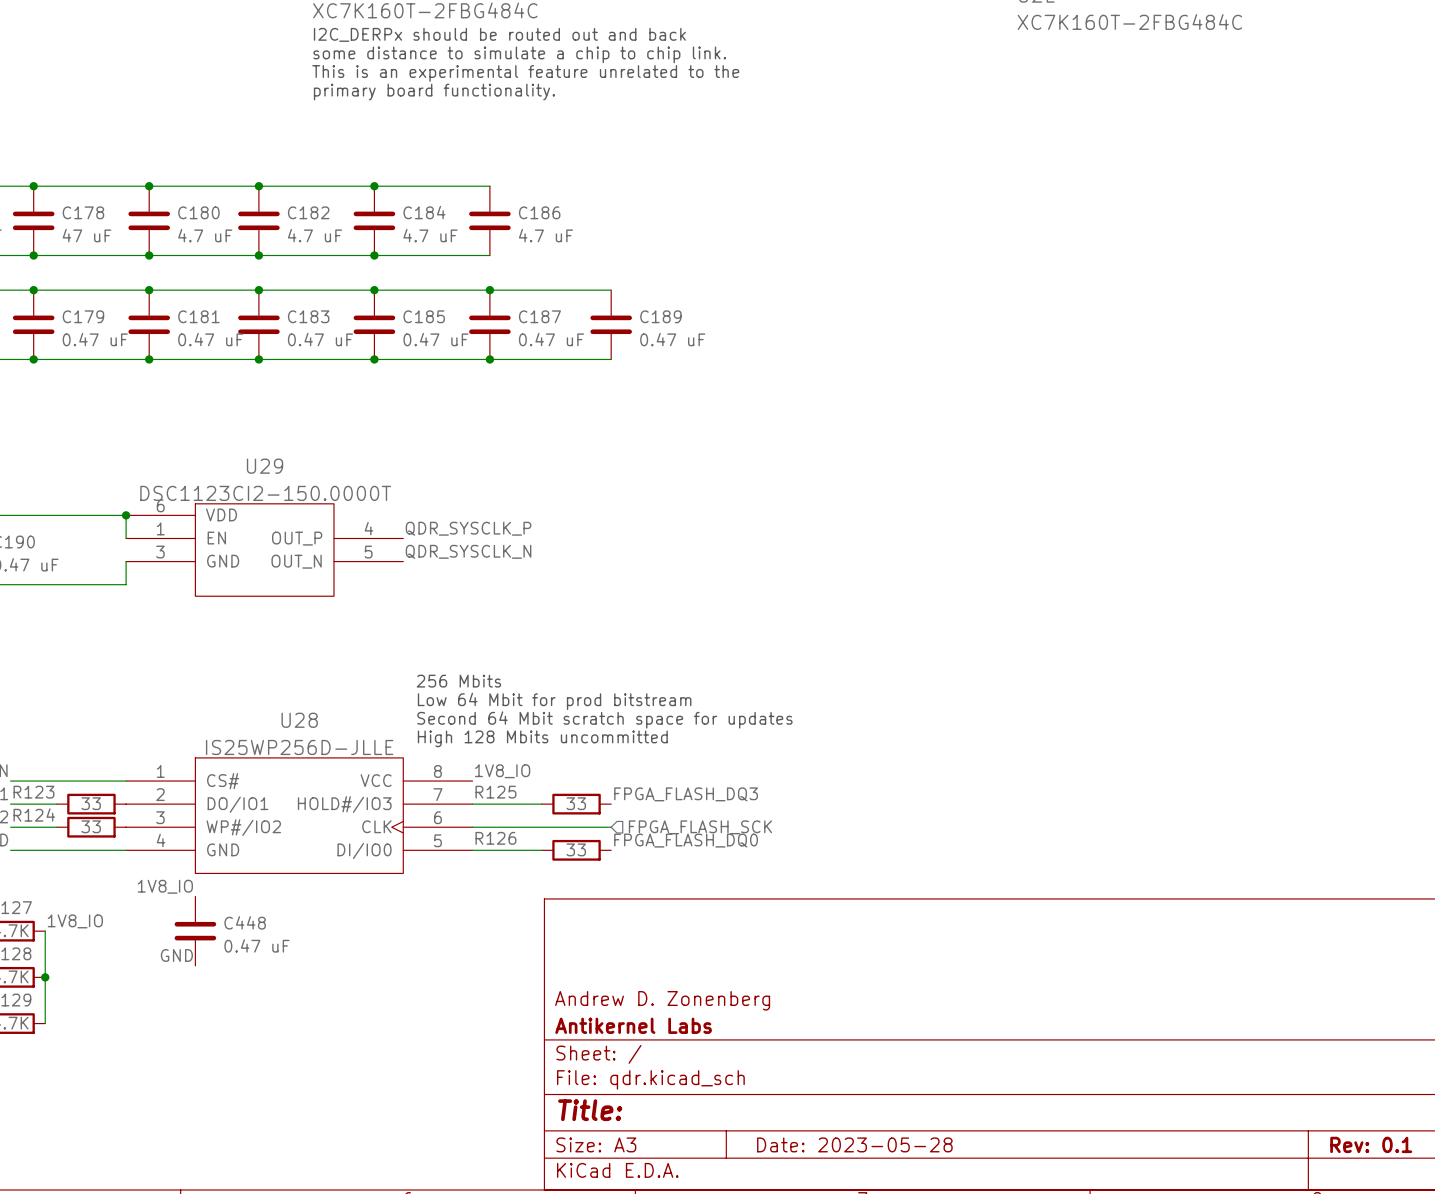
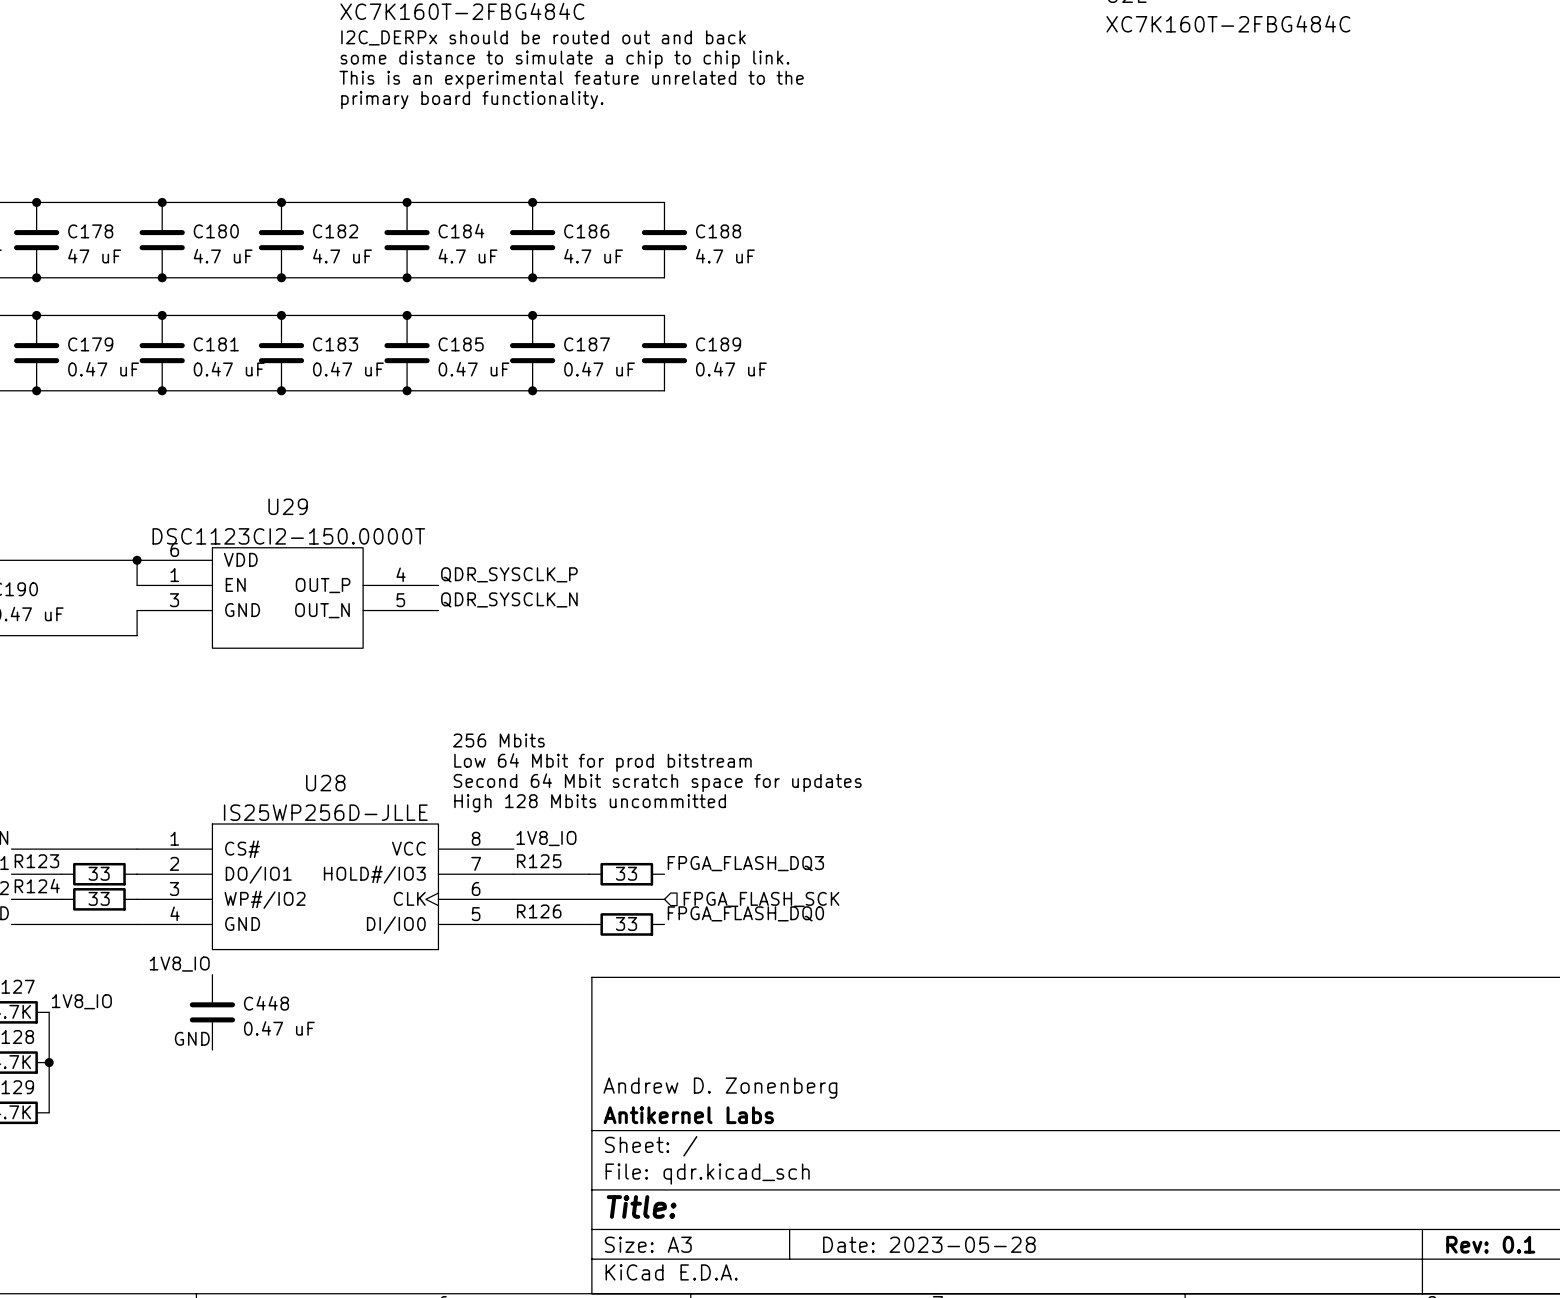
wire: none -> (532, 202) (664, 202)
junction: none -> (532, 202)
C188: none -> 4.7 uF (664, 240)
wire: none -> (532, 277) (664, 277)
junction: none -> (532, 277)

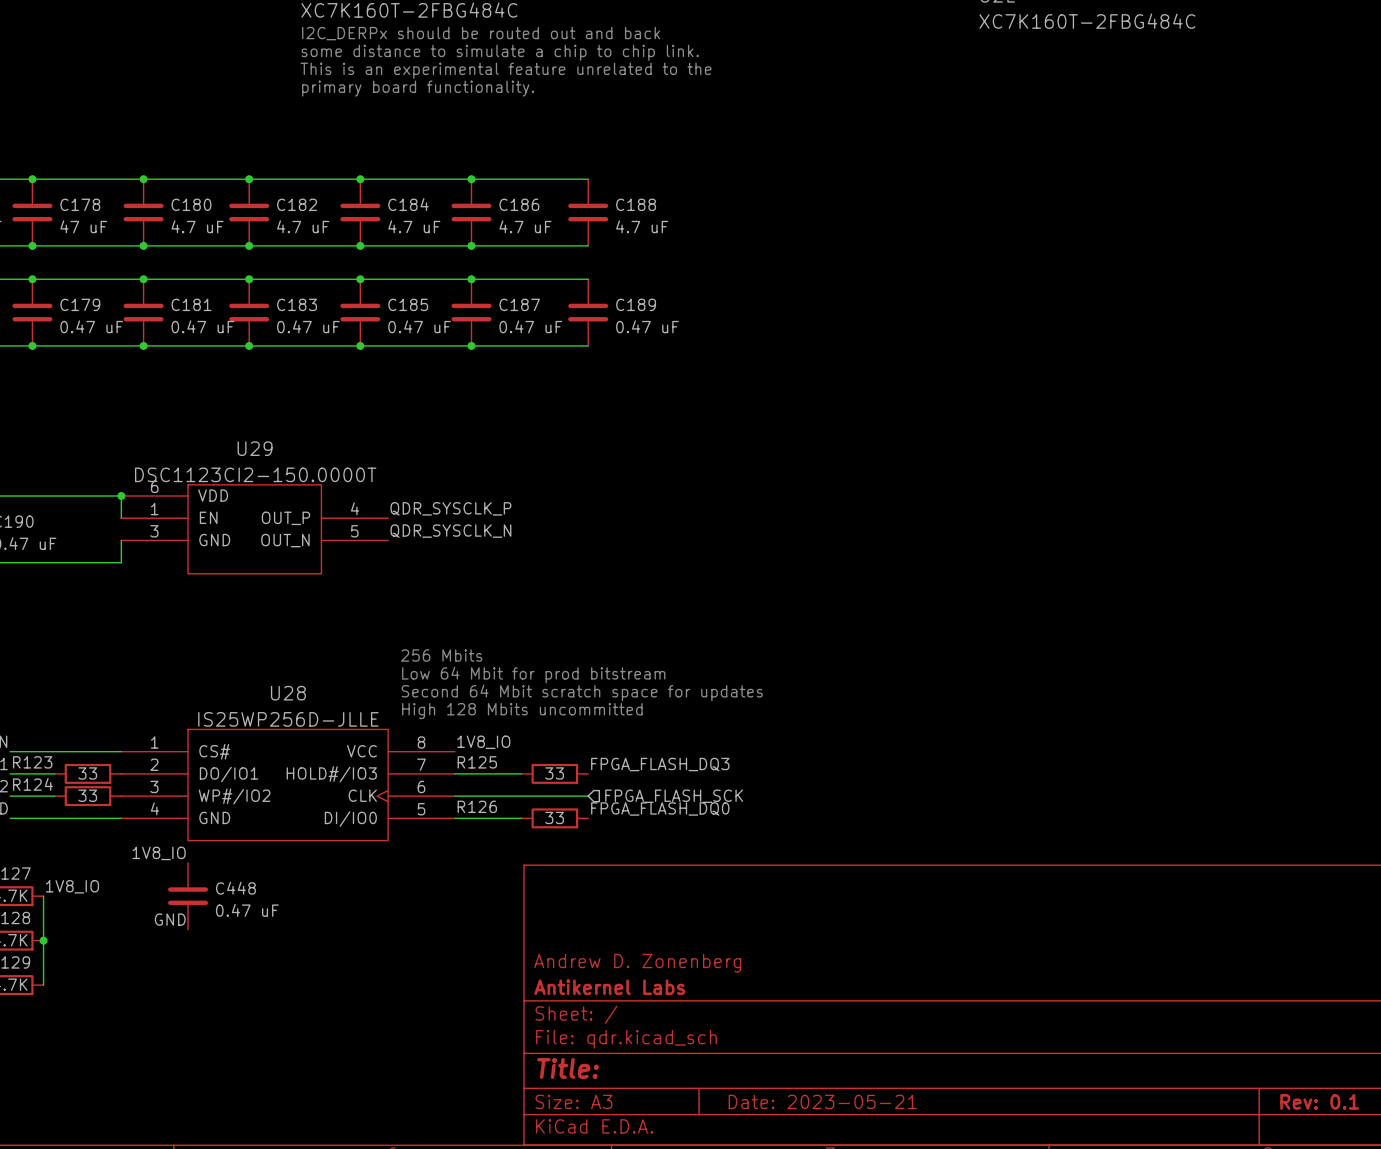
title block: Date: 2023-05-28 (929, 1244) -> Date: 2023-05-21 (822, 1101)

